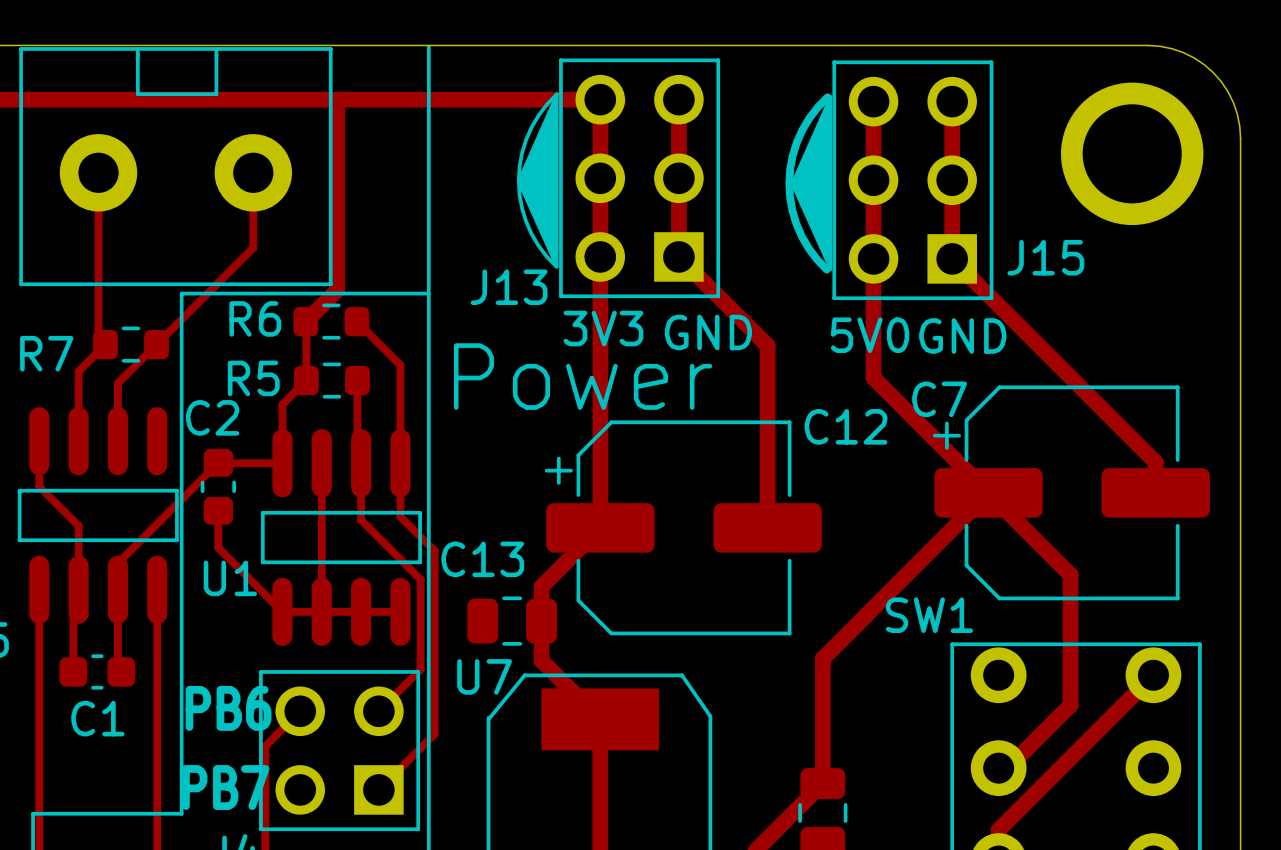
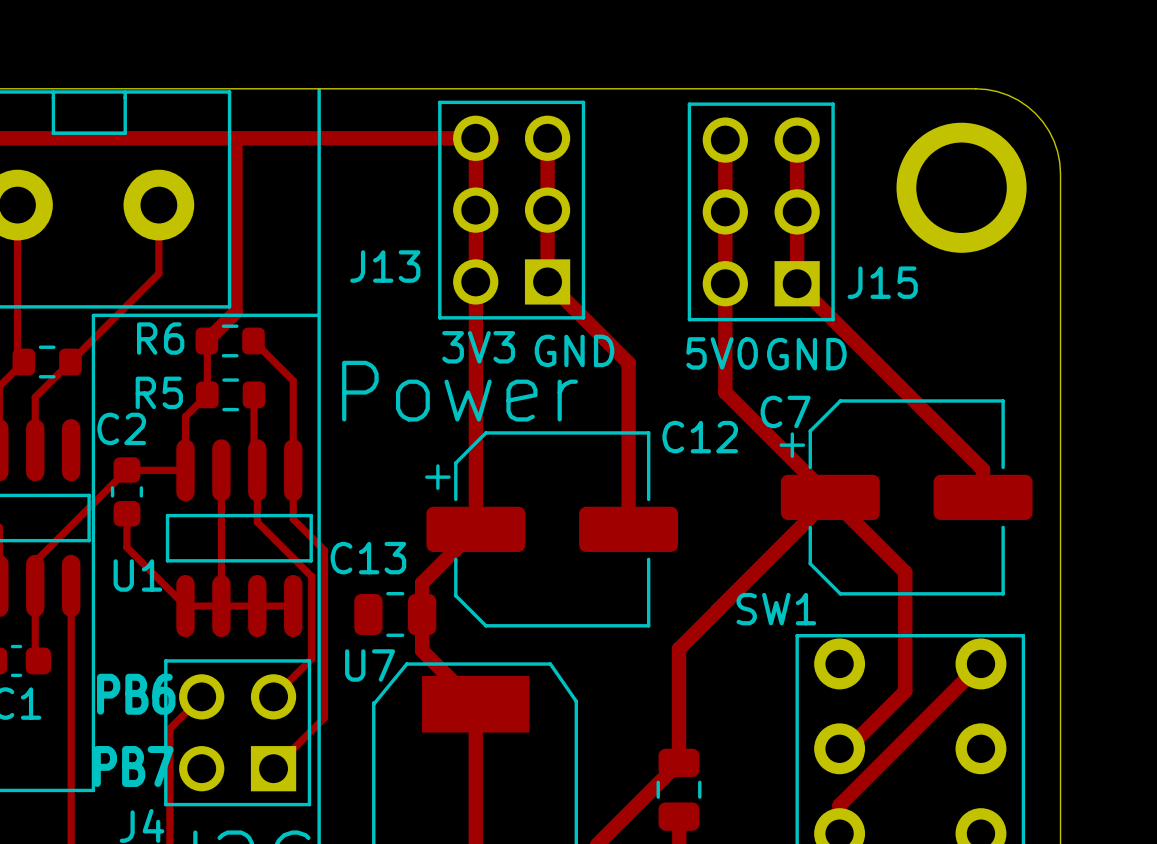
drawing: [516, 92, 559, 269] -> none
line: (557, 94) (547, 104) (531, 126) (522, 152) (518, 180) (521, 207) (525, 220) (538, 245) (556, 266) -> none
drawing: [790, 94, 833, 272] -> none
line: (827, 97) (809, 118) (802, 130) (792, 155) (789, 183) (792, 210) (801, 236) (808, 248) (826, 269) -> none
J13 name position: J13 (509, 287) -> J13 (385, 266)

